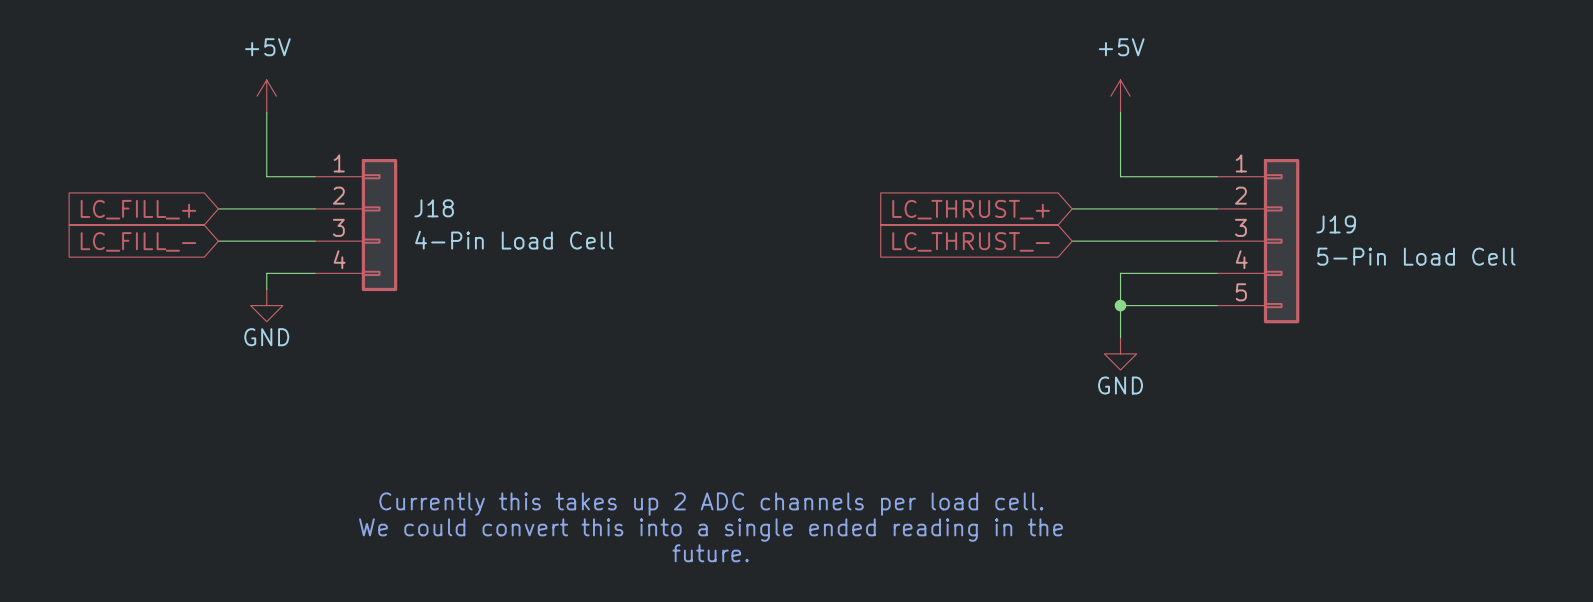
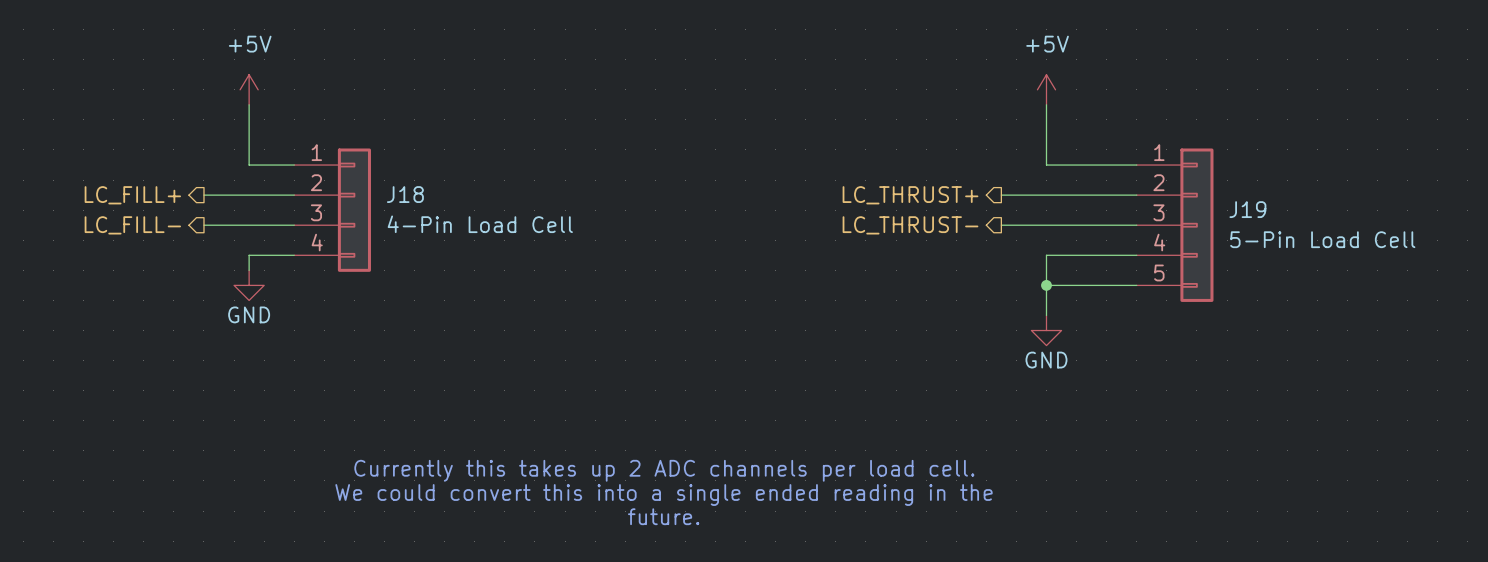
global label: LC_FILL_+ (138, 209) -> none
hierarchical label: none -> LC_FILL+ (132, 195)
global label: LC_THRUST_+ (971, 209) -> none
hierarchical label: none -> LC_THRUST+ (910, 195)
global label: LC_FILL_- (138, 241) -> none
hierarchical label: none -> LC_FILL- (132, 225)
global label: LC_THRUST_- (971, 241) -> none
hierarchical label: none -> LC_THRUST- (910, 225)

